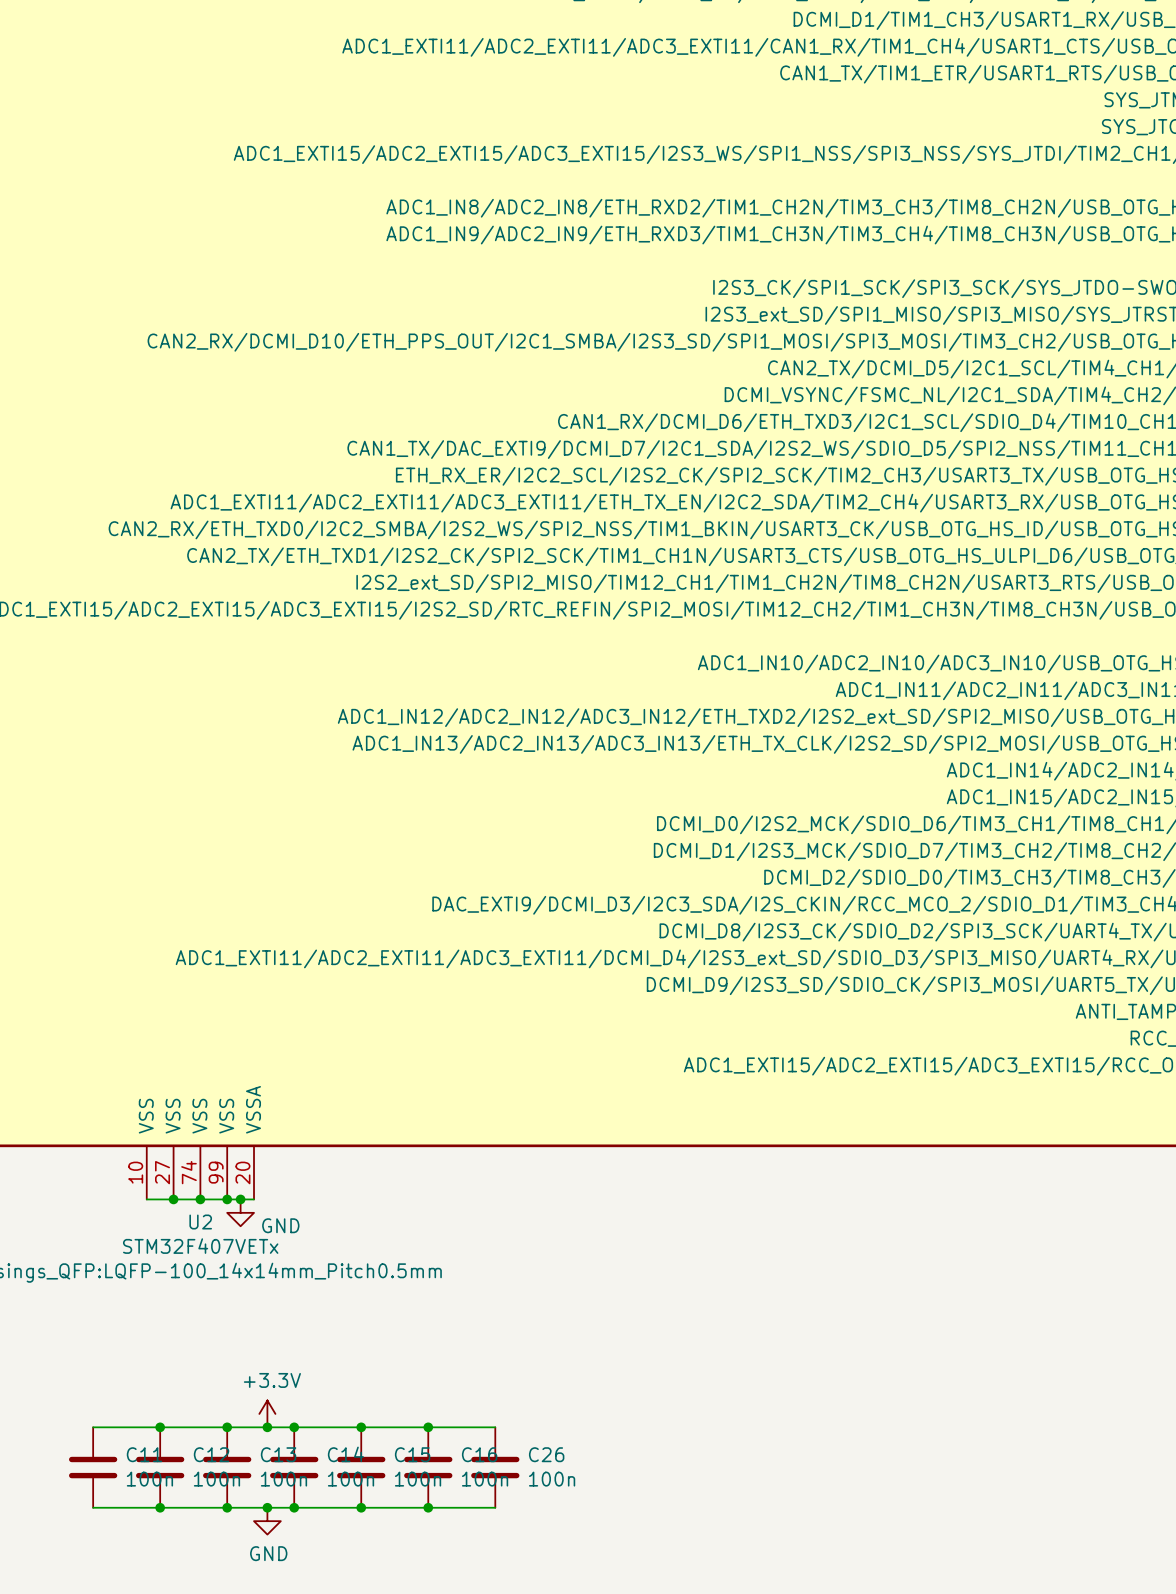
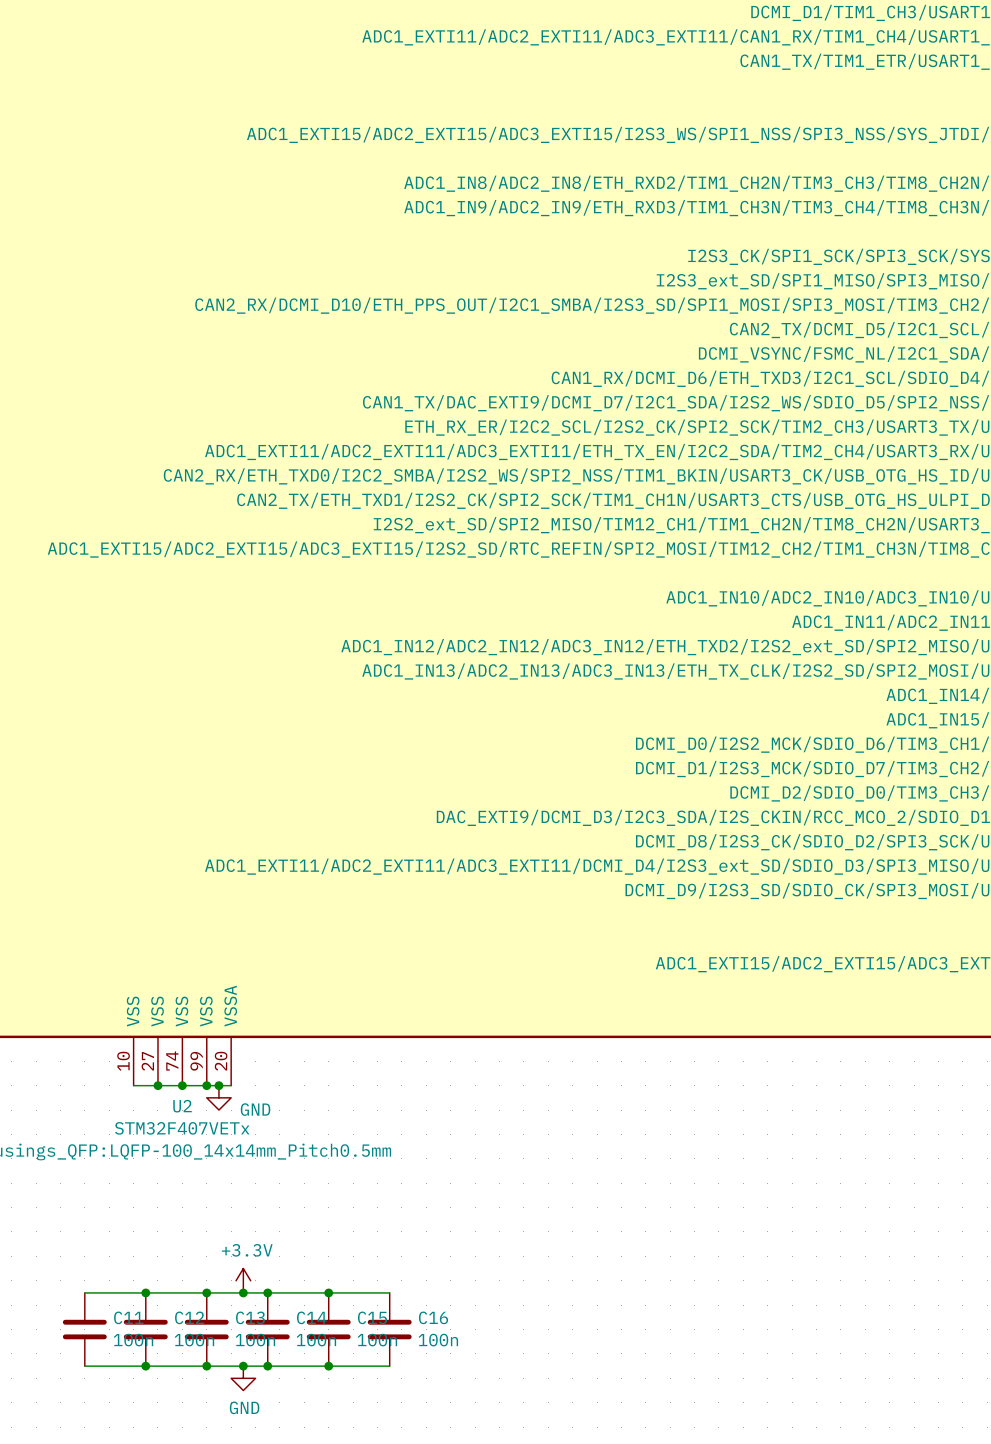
wire: (428, 1427) (495, 1427) -> none
junction: (428, 1427) -> none
C26: 100n (495, 1467) -> none
wire: (428, 1507) (495, 1507) -> none
junction: (428, 1507) -> none

